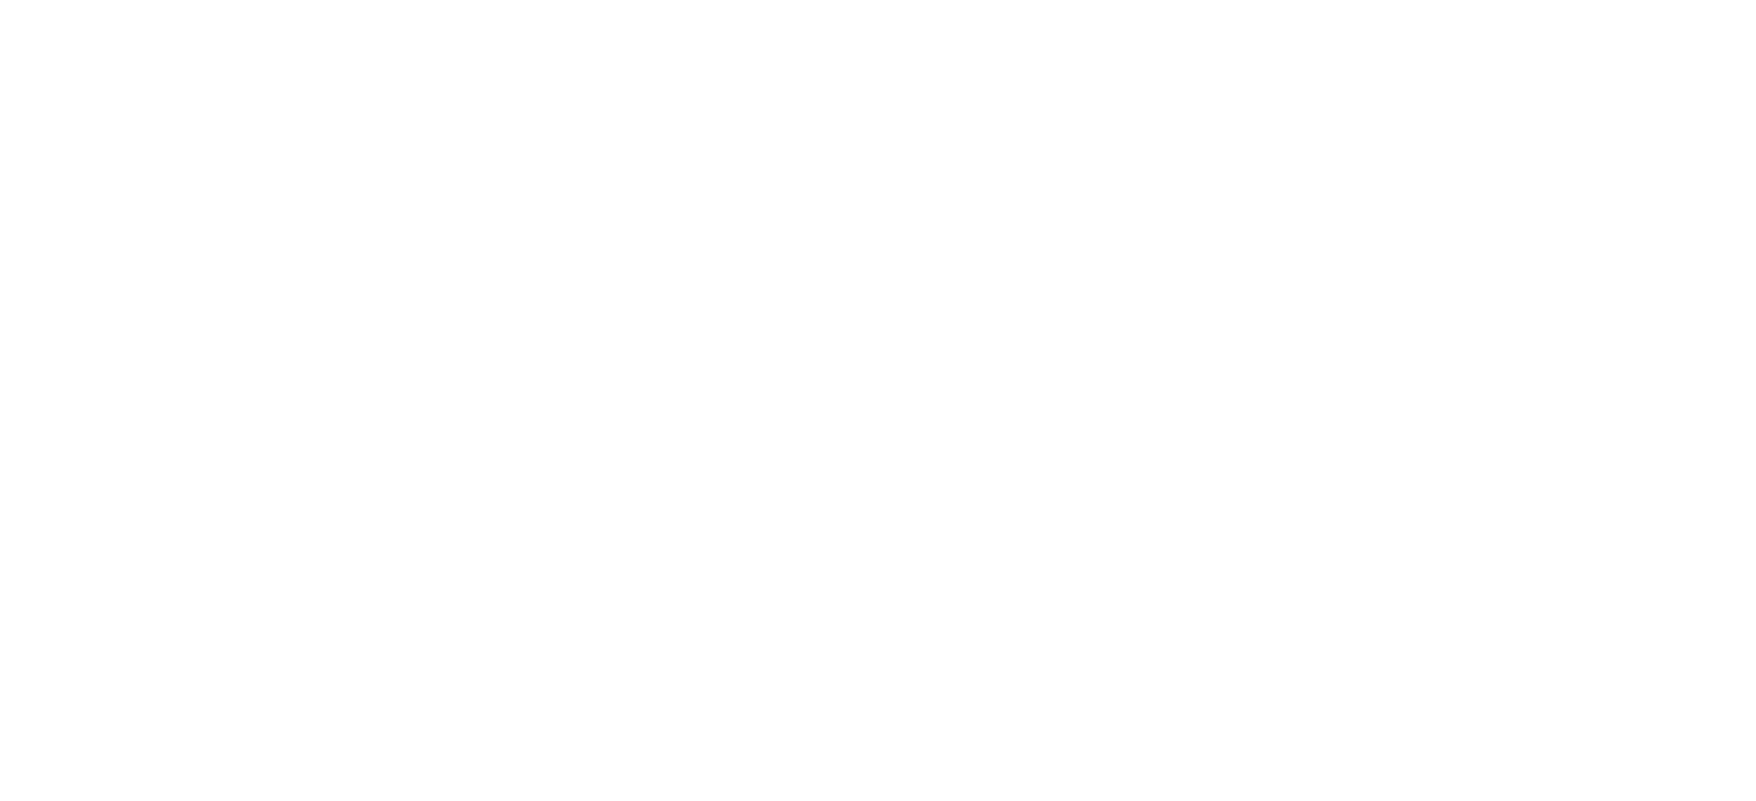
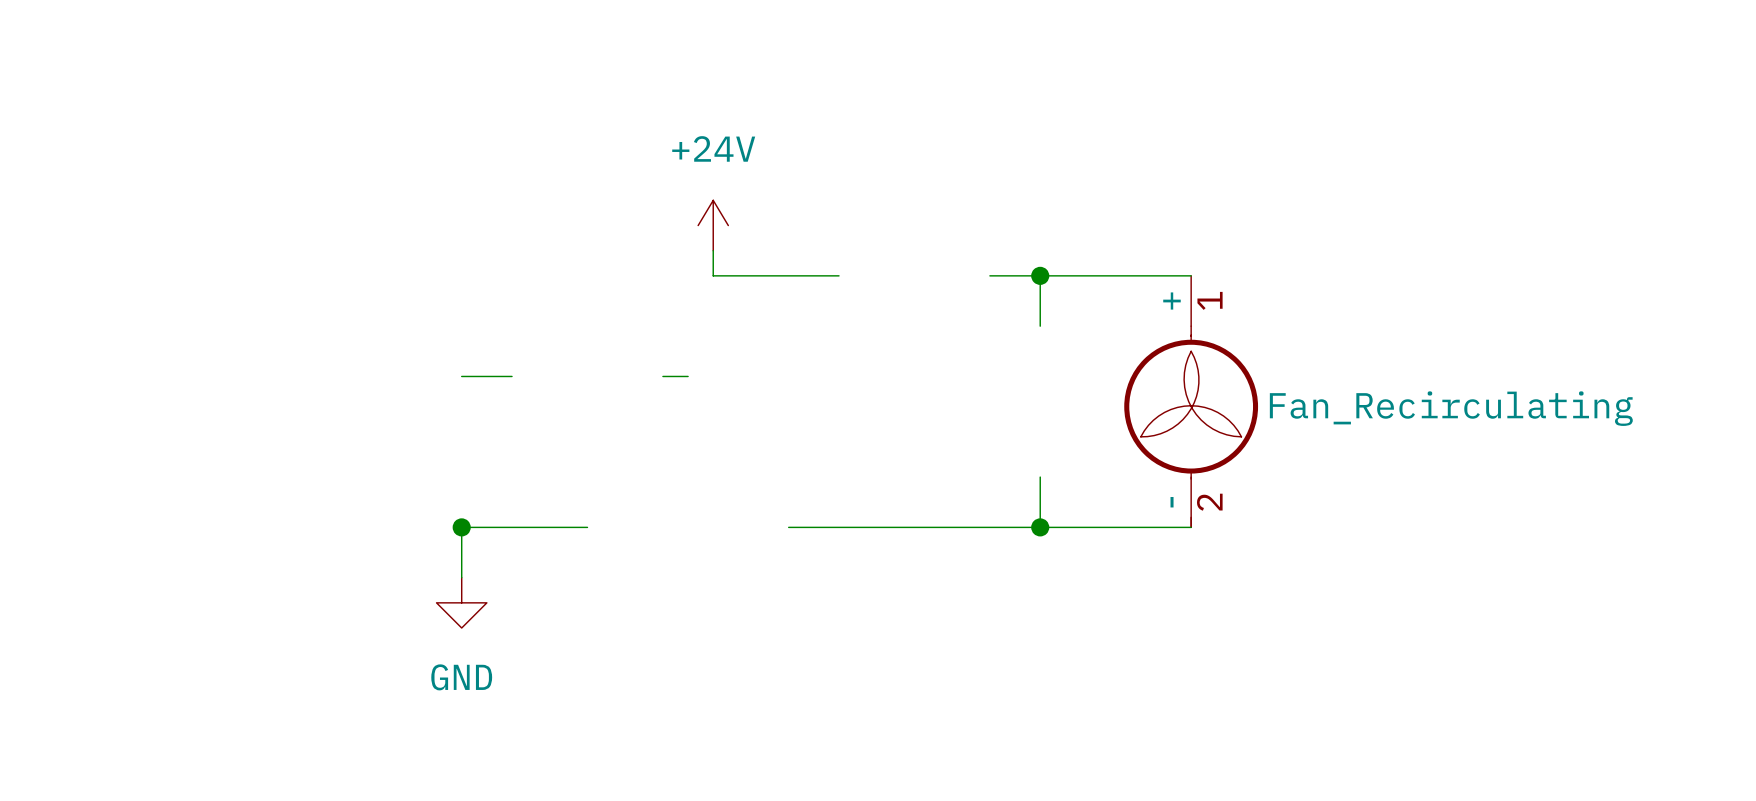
power symbol: none -> +24V (713, 225)
wire: none -> (713, 250) (713, 275) (839, 275)
wire: none -> (989, 275) (1191, 275)
wire: none -> (1040, 275) (1040, 326)
junction: none -> (1040, 275)
wire: none -> (461, 376) (512, 376)
wire: none -> (662, 376) (688, 376)
part: none -> Fan_Recirculating (1191, 401)
wire: none -> (1040, 477) (1040, 527)
junction: none -> (461, 527)
wire: none -> (587, 527) (461, 527) (461, 577)
wire: none -> (788, 527) (1191, 527)
junction: none -> (1040, 527)
power symbol: none -> GND (461, 602)

